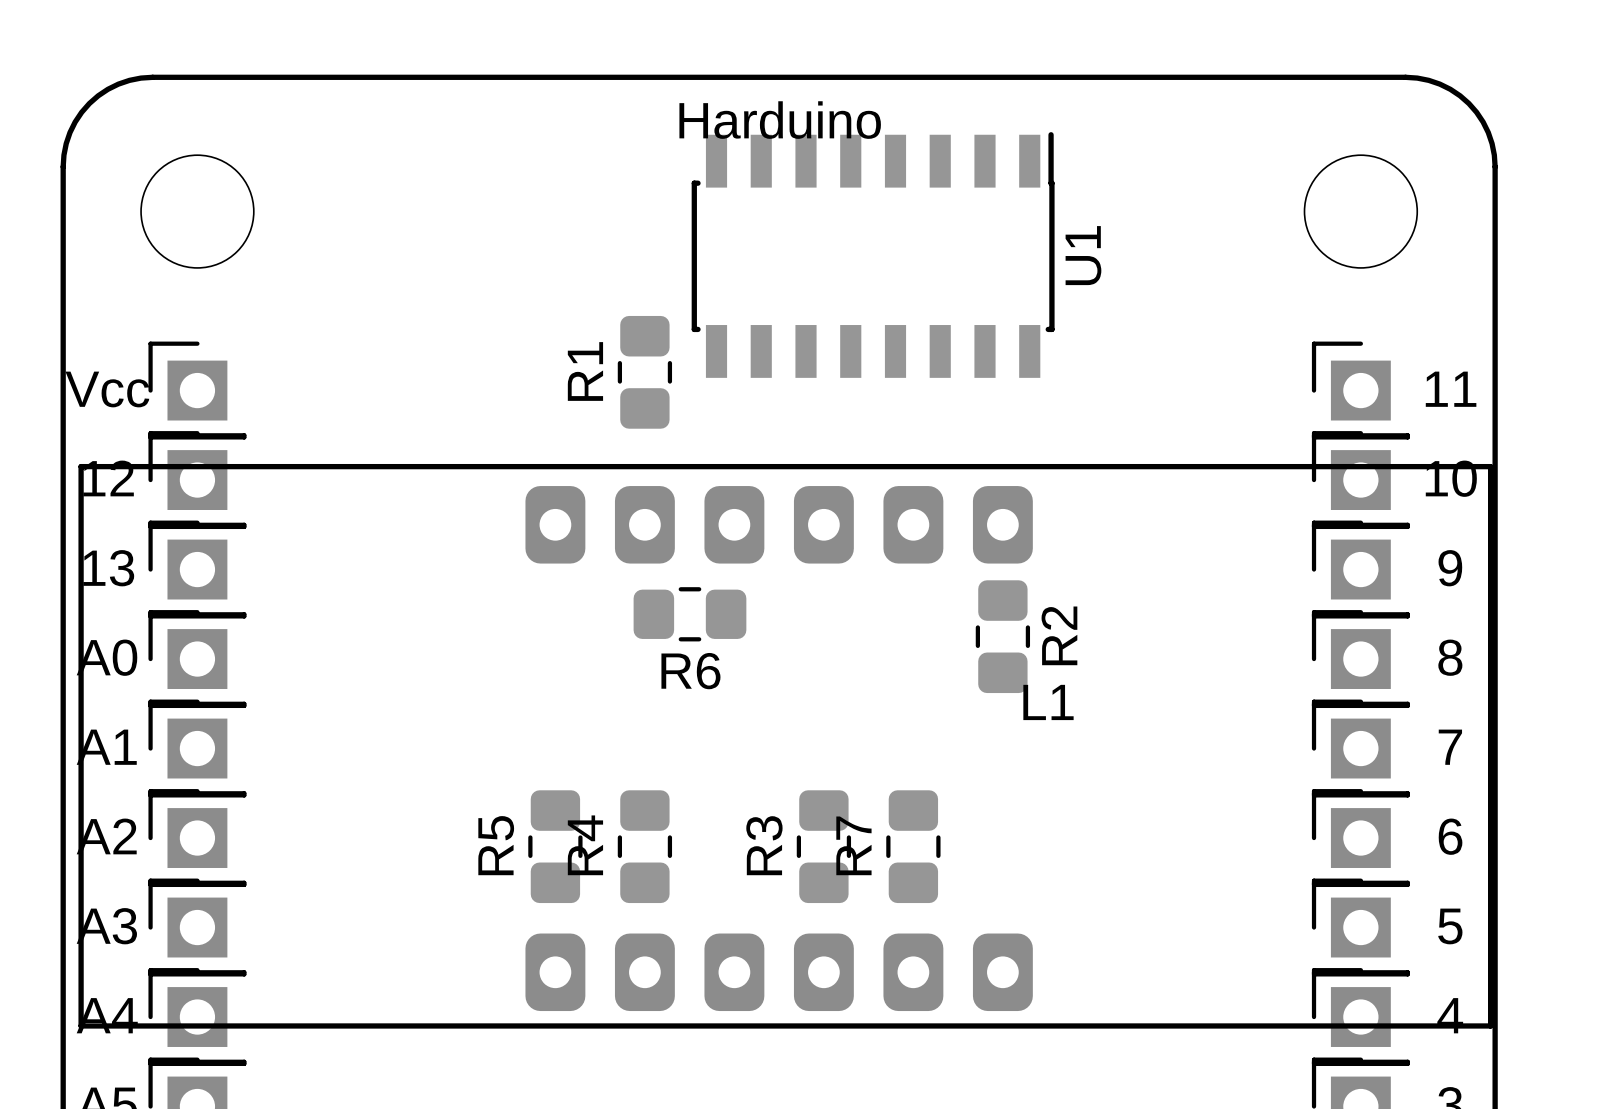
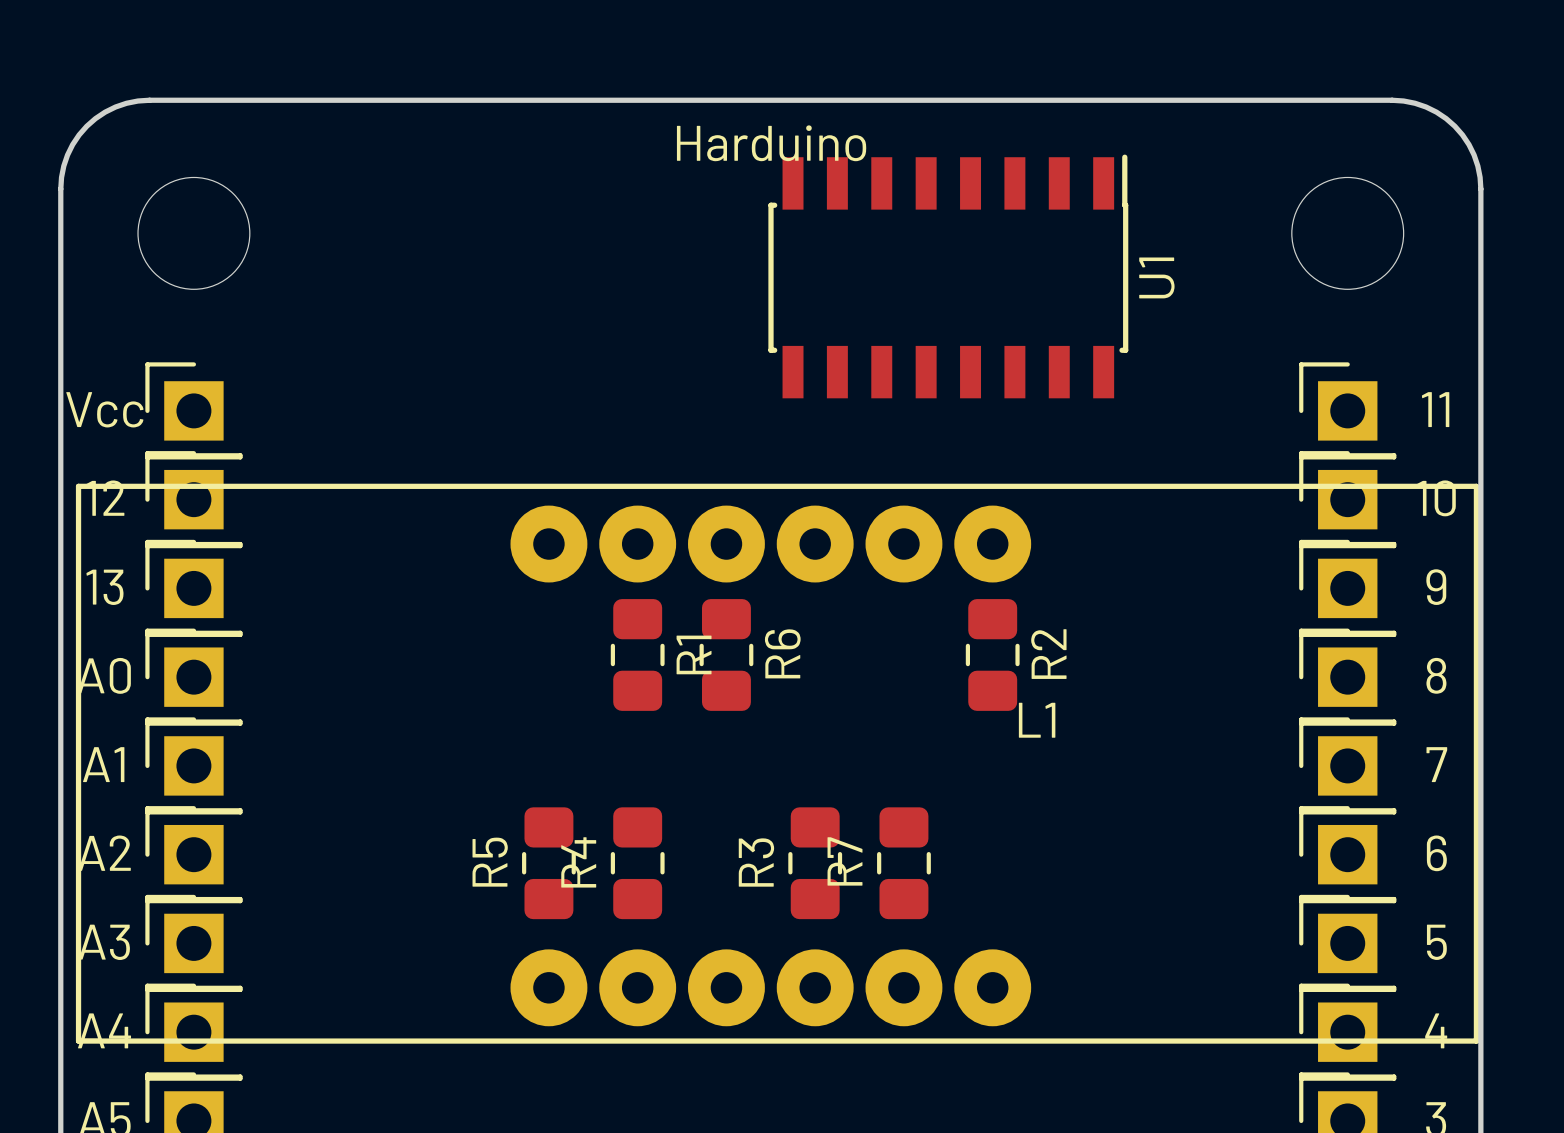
U1 position: (873, 254) -> (948, 276)
R1 name position: R1 (585, 371) -> R1 (694, 654)
R1 position: (644, 372) -> (637, 654)
L1 footprint: [78, 463, 1494, 1029] -> [75, 483, 1480, 1044]
R6 rotation: 0° (689, 614) -> 90° clockwise (726, 654)
R6 name position: R6 (690, 671) -> R6 (782, 653)

